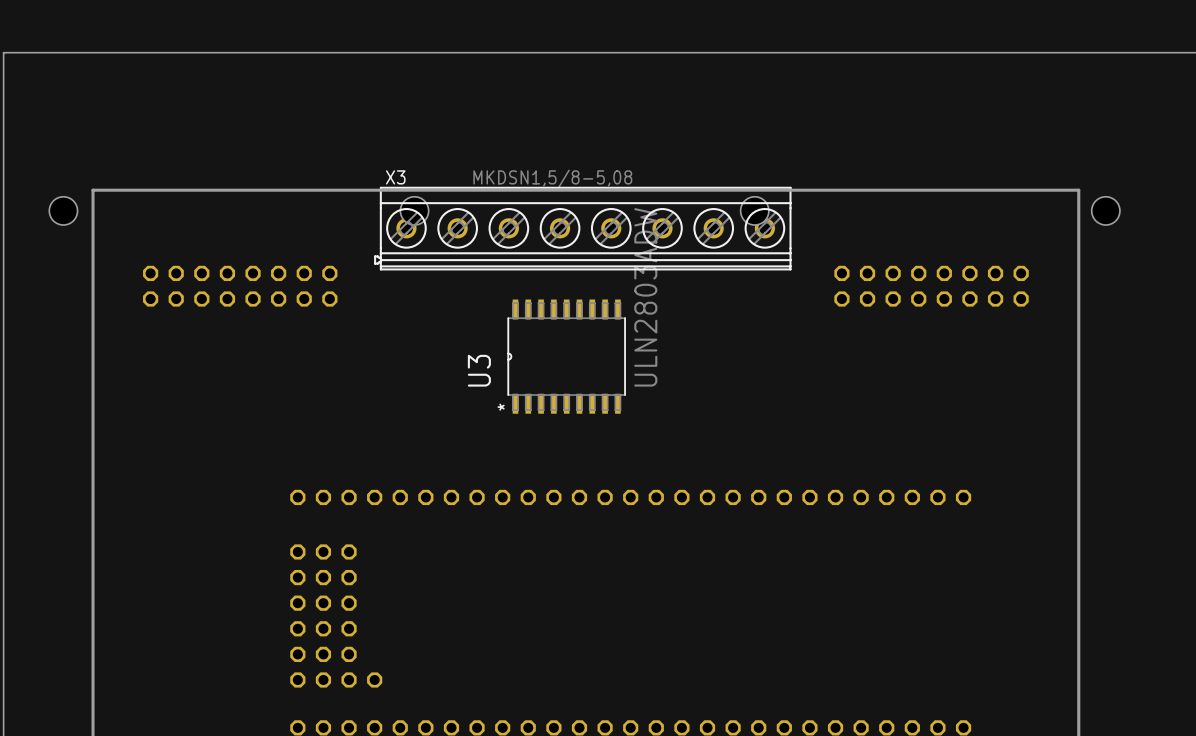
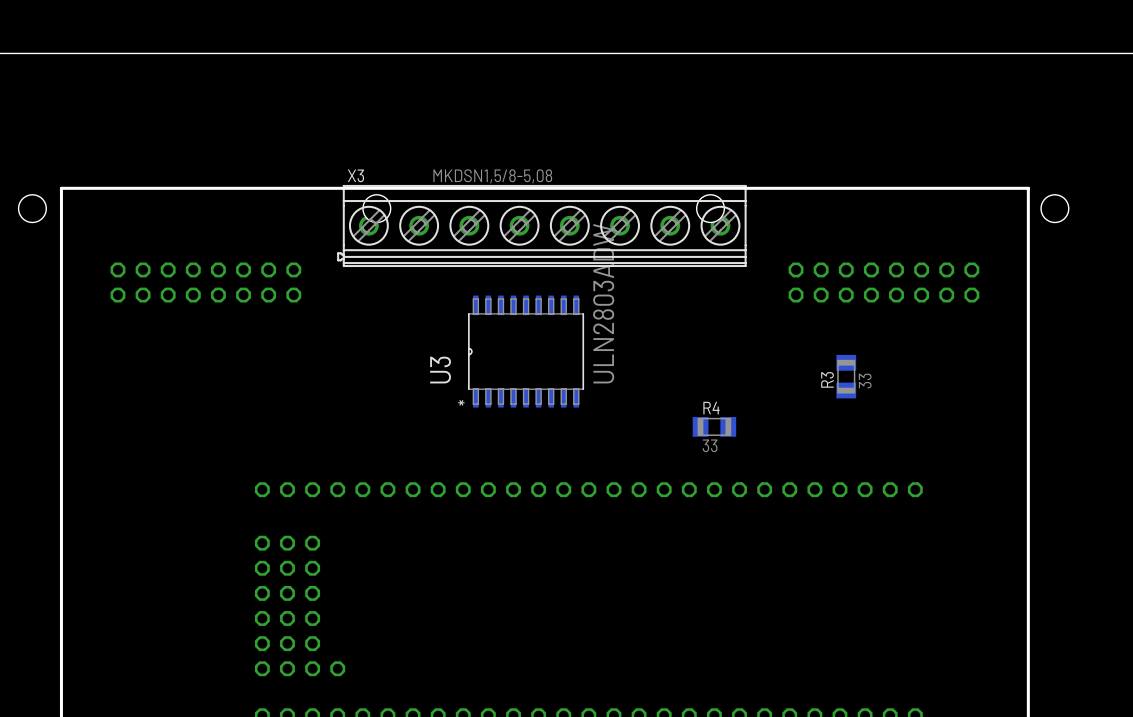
R3: none -> 33 (846, 376)
R4: none -> 33 (714, 426)

